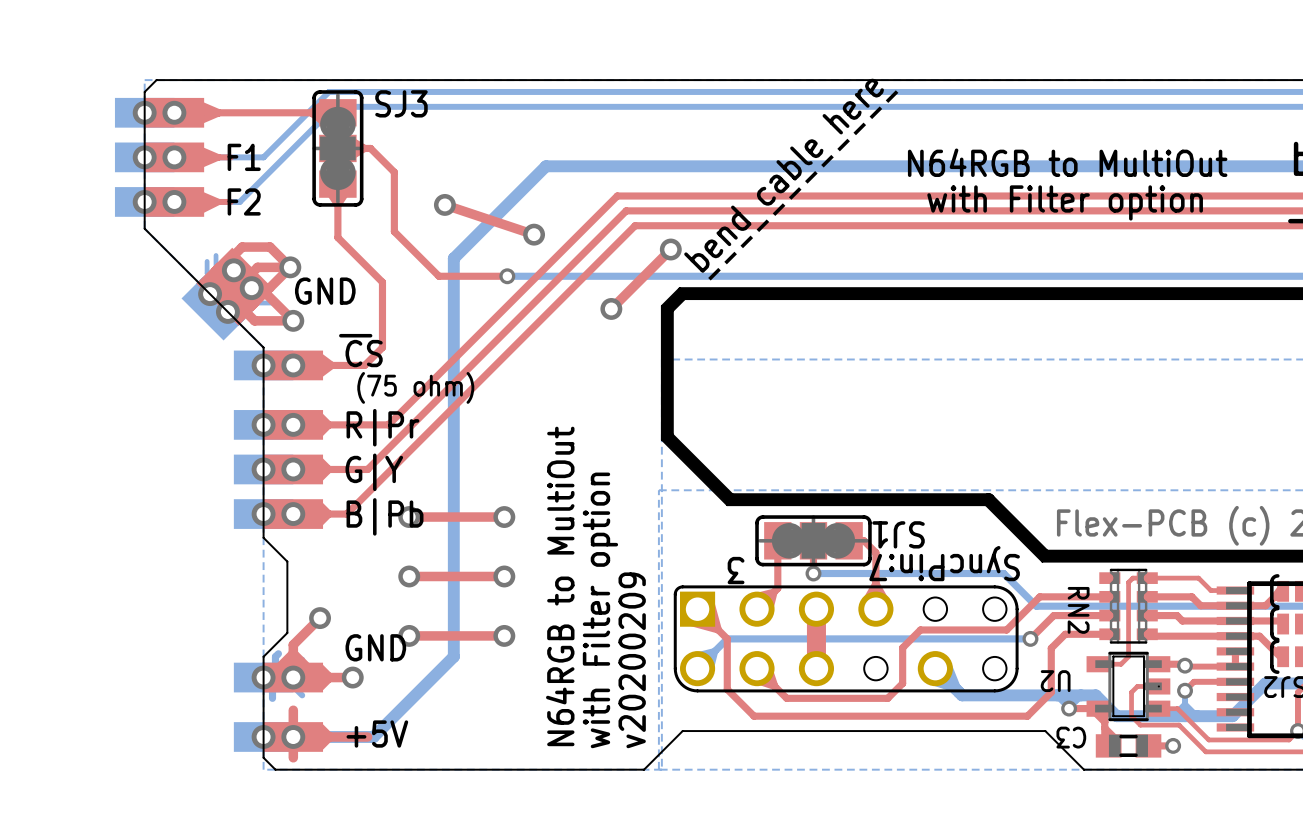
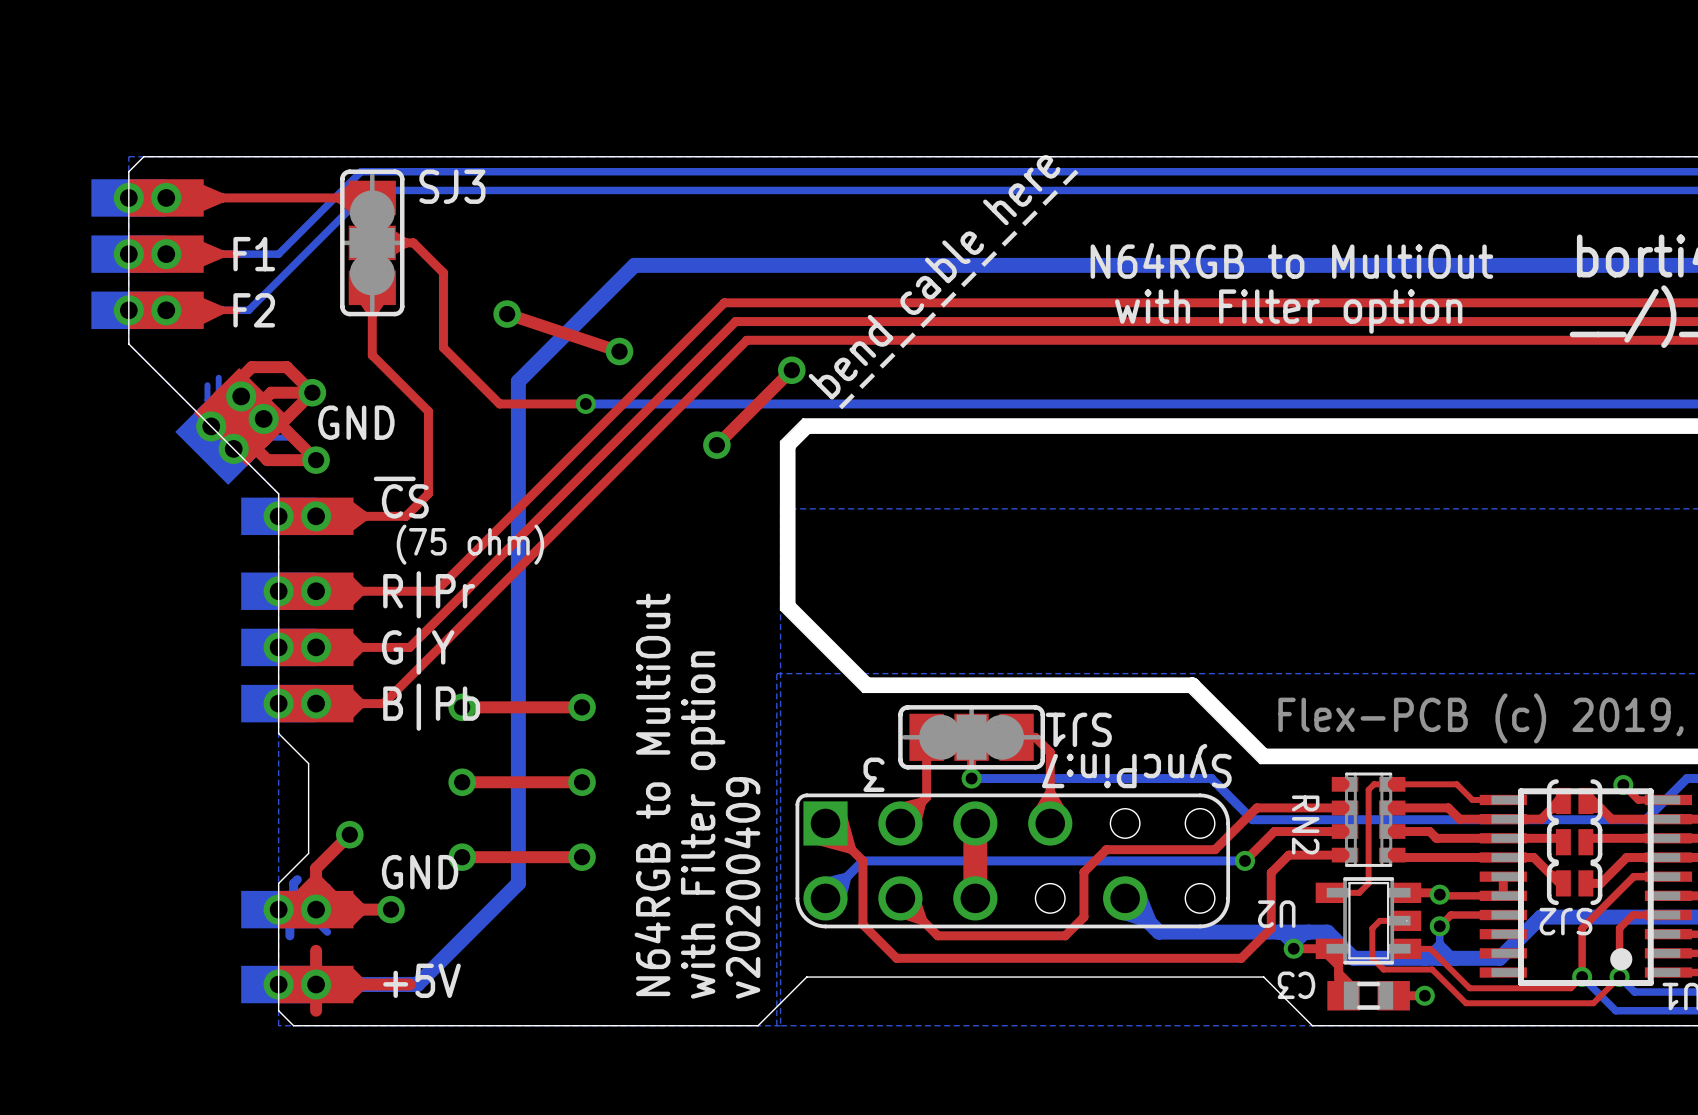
text: v20200209 (632, 660) -> v20200409 (742, 887)

